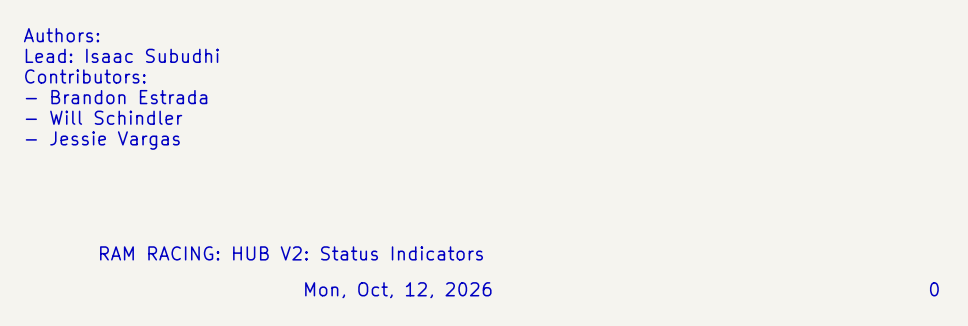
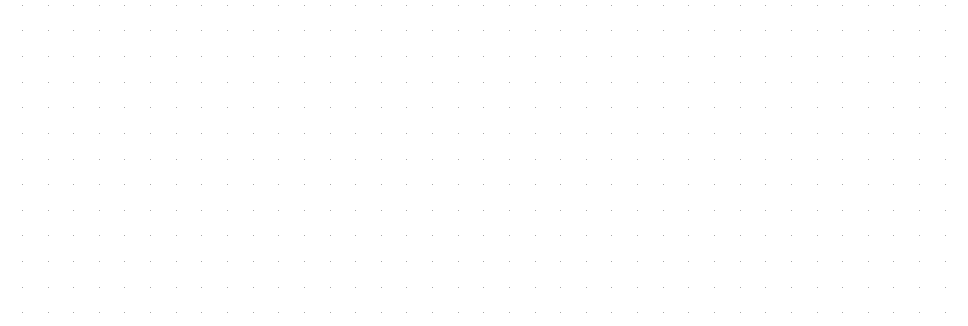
text: Authors: (61, 35) -> none
text: Lead: Isaac Subudhi (122, 55) -> none
text: Contributors: (85, 76) -> none
text: - Brandon Estrada (116, 97) -> none
text: - Will Schindler (103, 117) -> none
text: - Jessie Vargas (102, 140) -> none
text: RAM RACING: HUB V2: Status Indicators (291, 253) -> none
text: 0 (934, 289) -> none
text: Mon, Oct, 12, 2026 (398, 290) -> none

